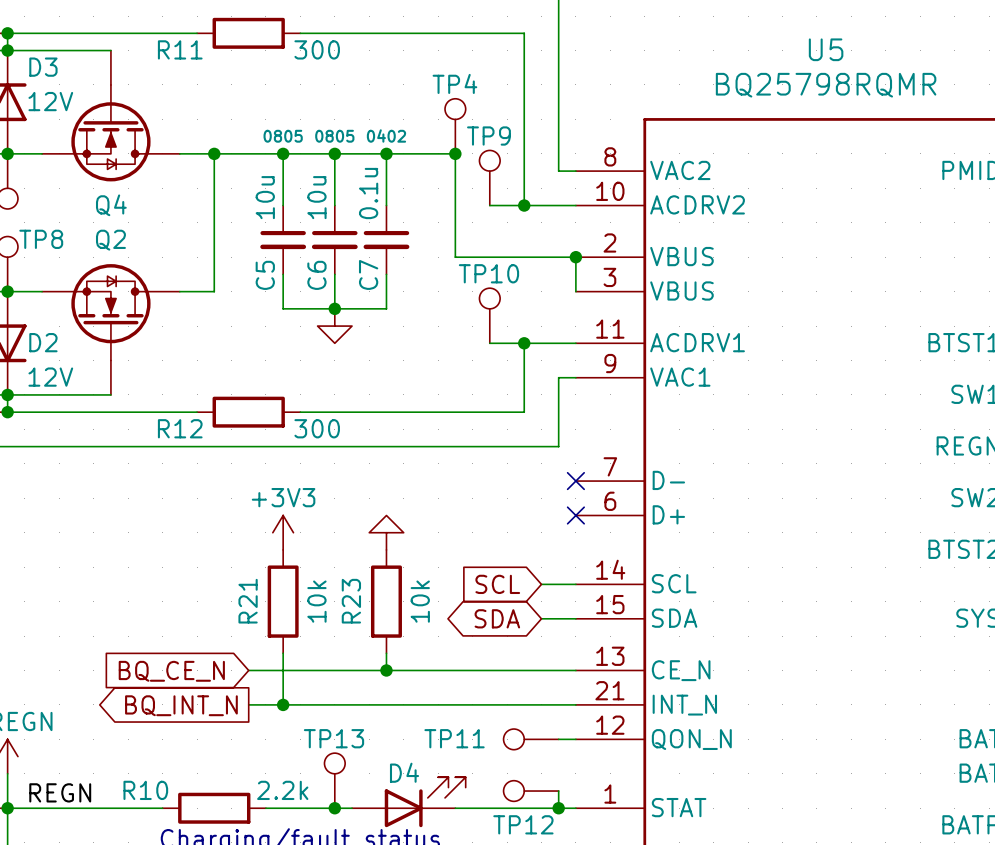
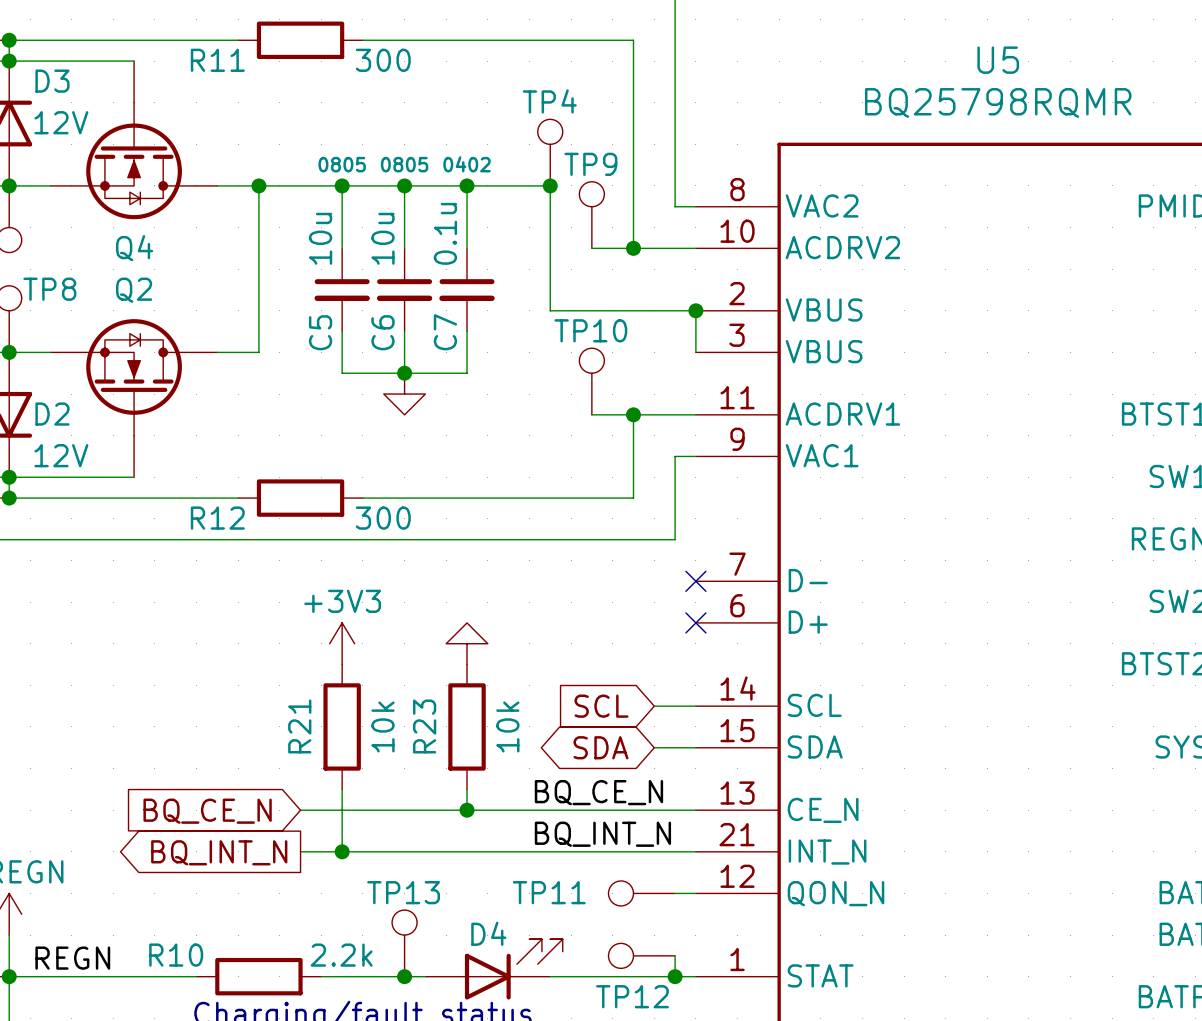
label: none -> BQ_CE_N (598, 792)
label: none -> BQ_INT_N (602, 834)

